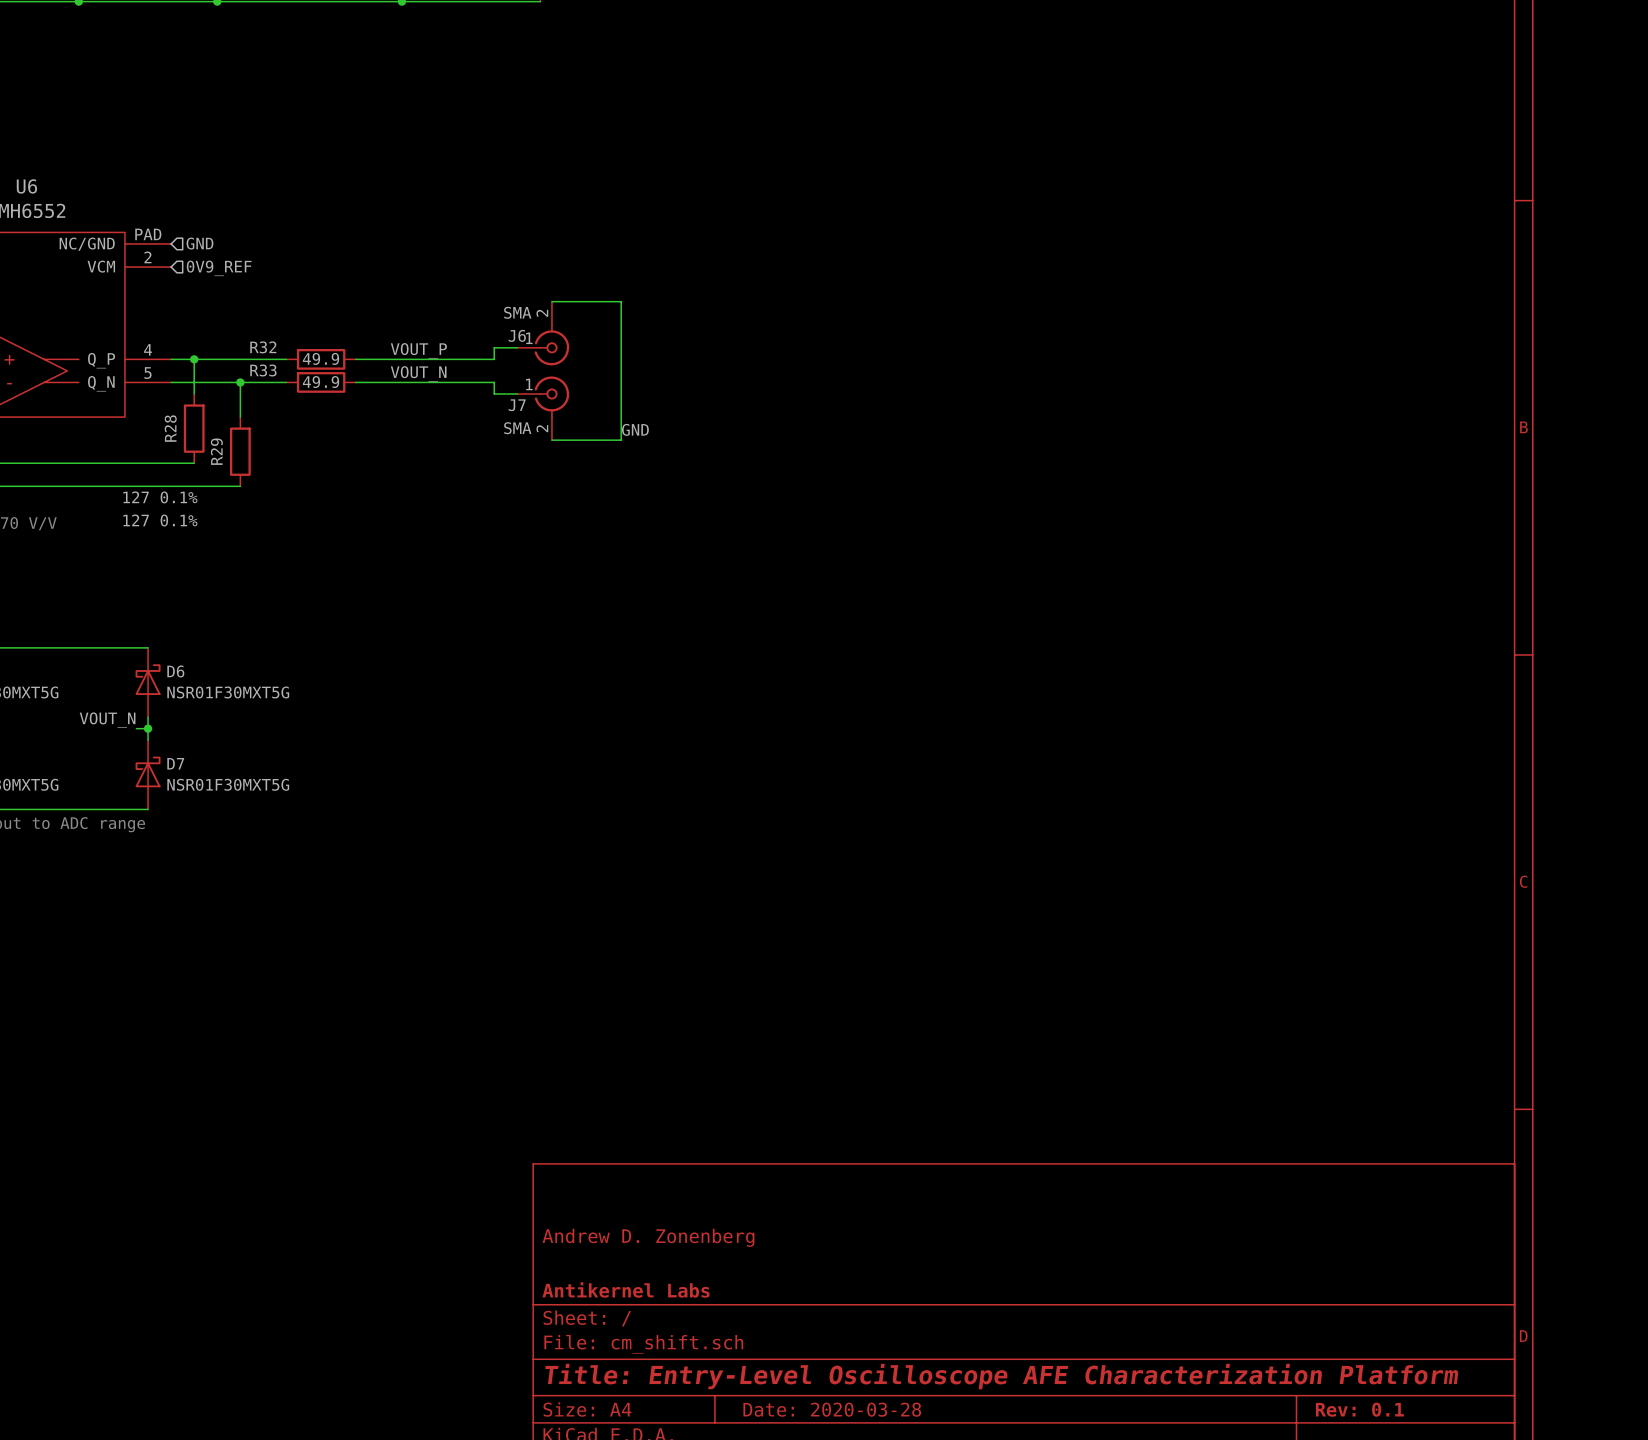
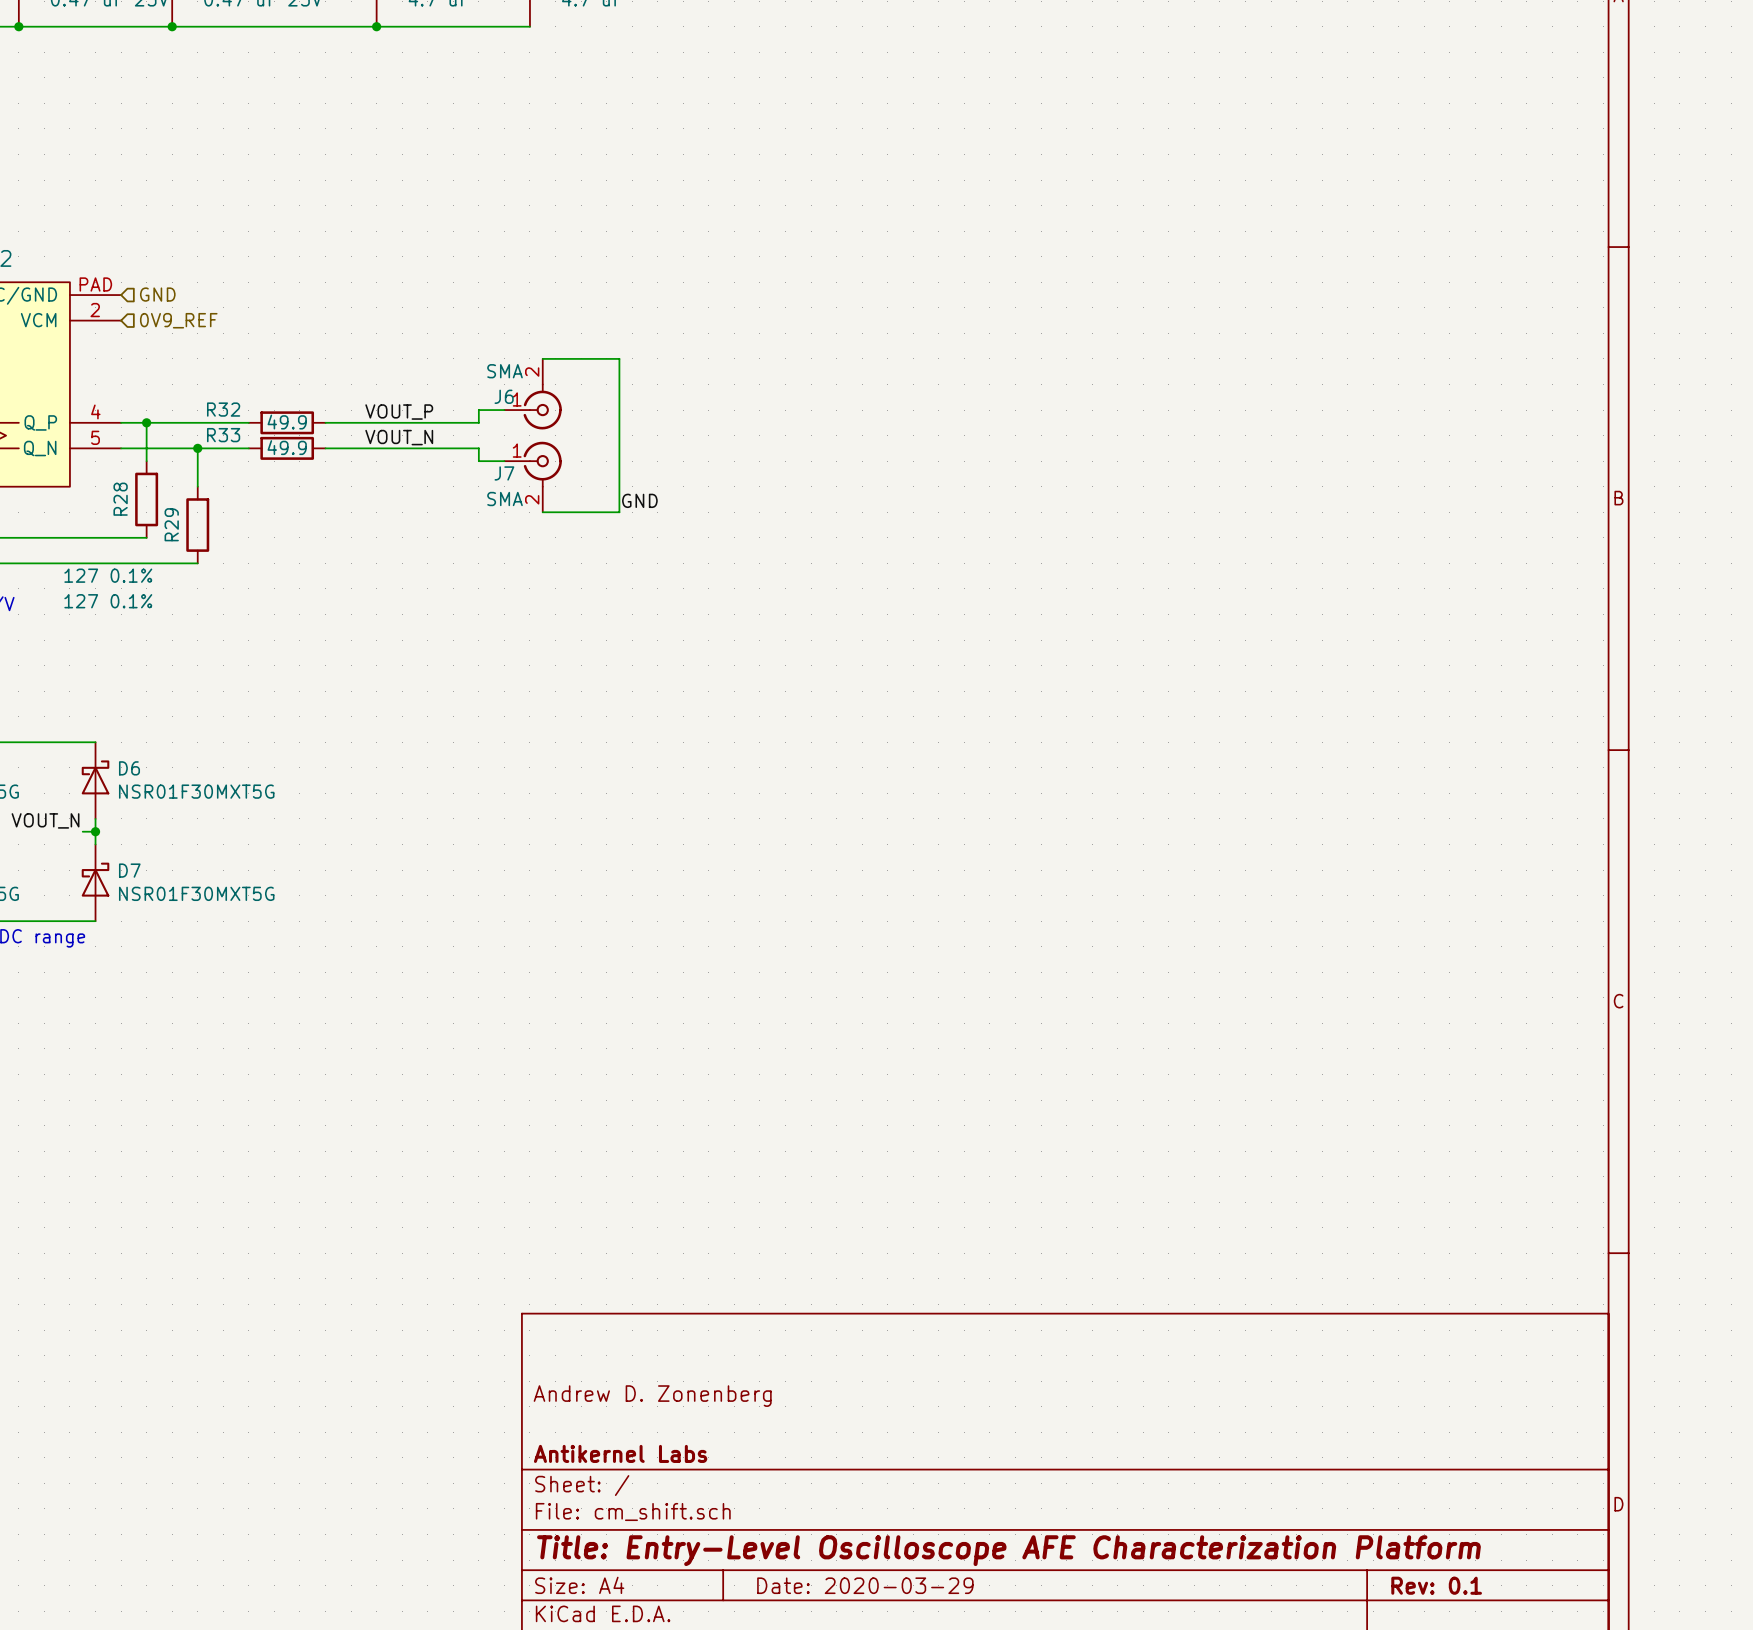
title block: Date: 2020-03-28 (832, 1409) -> Date: 2020-03-29 (865, 1585)

